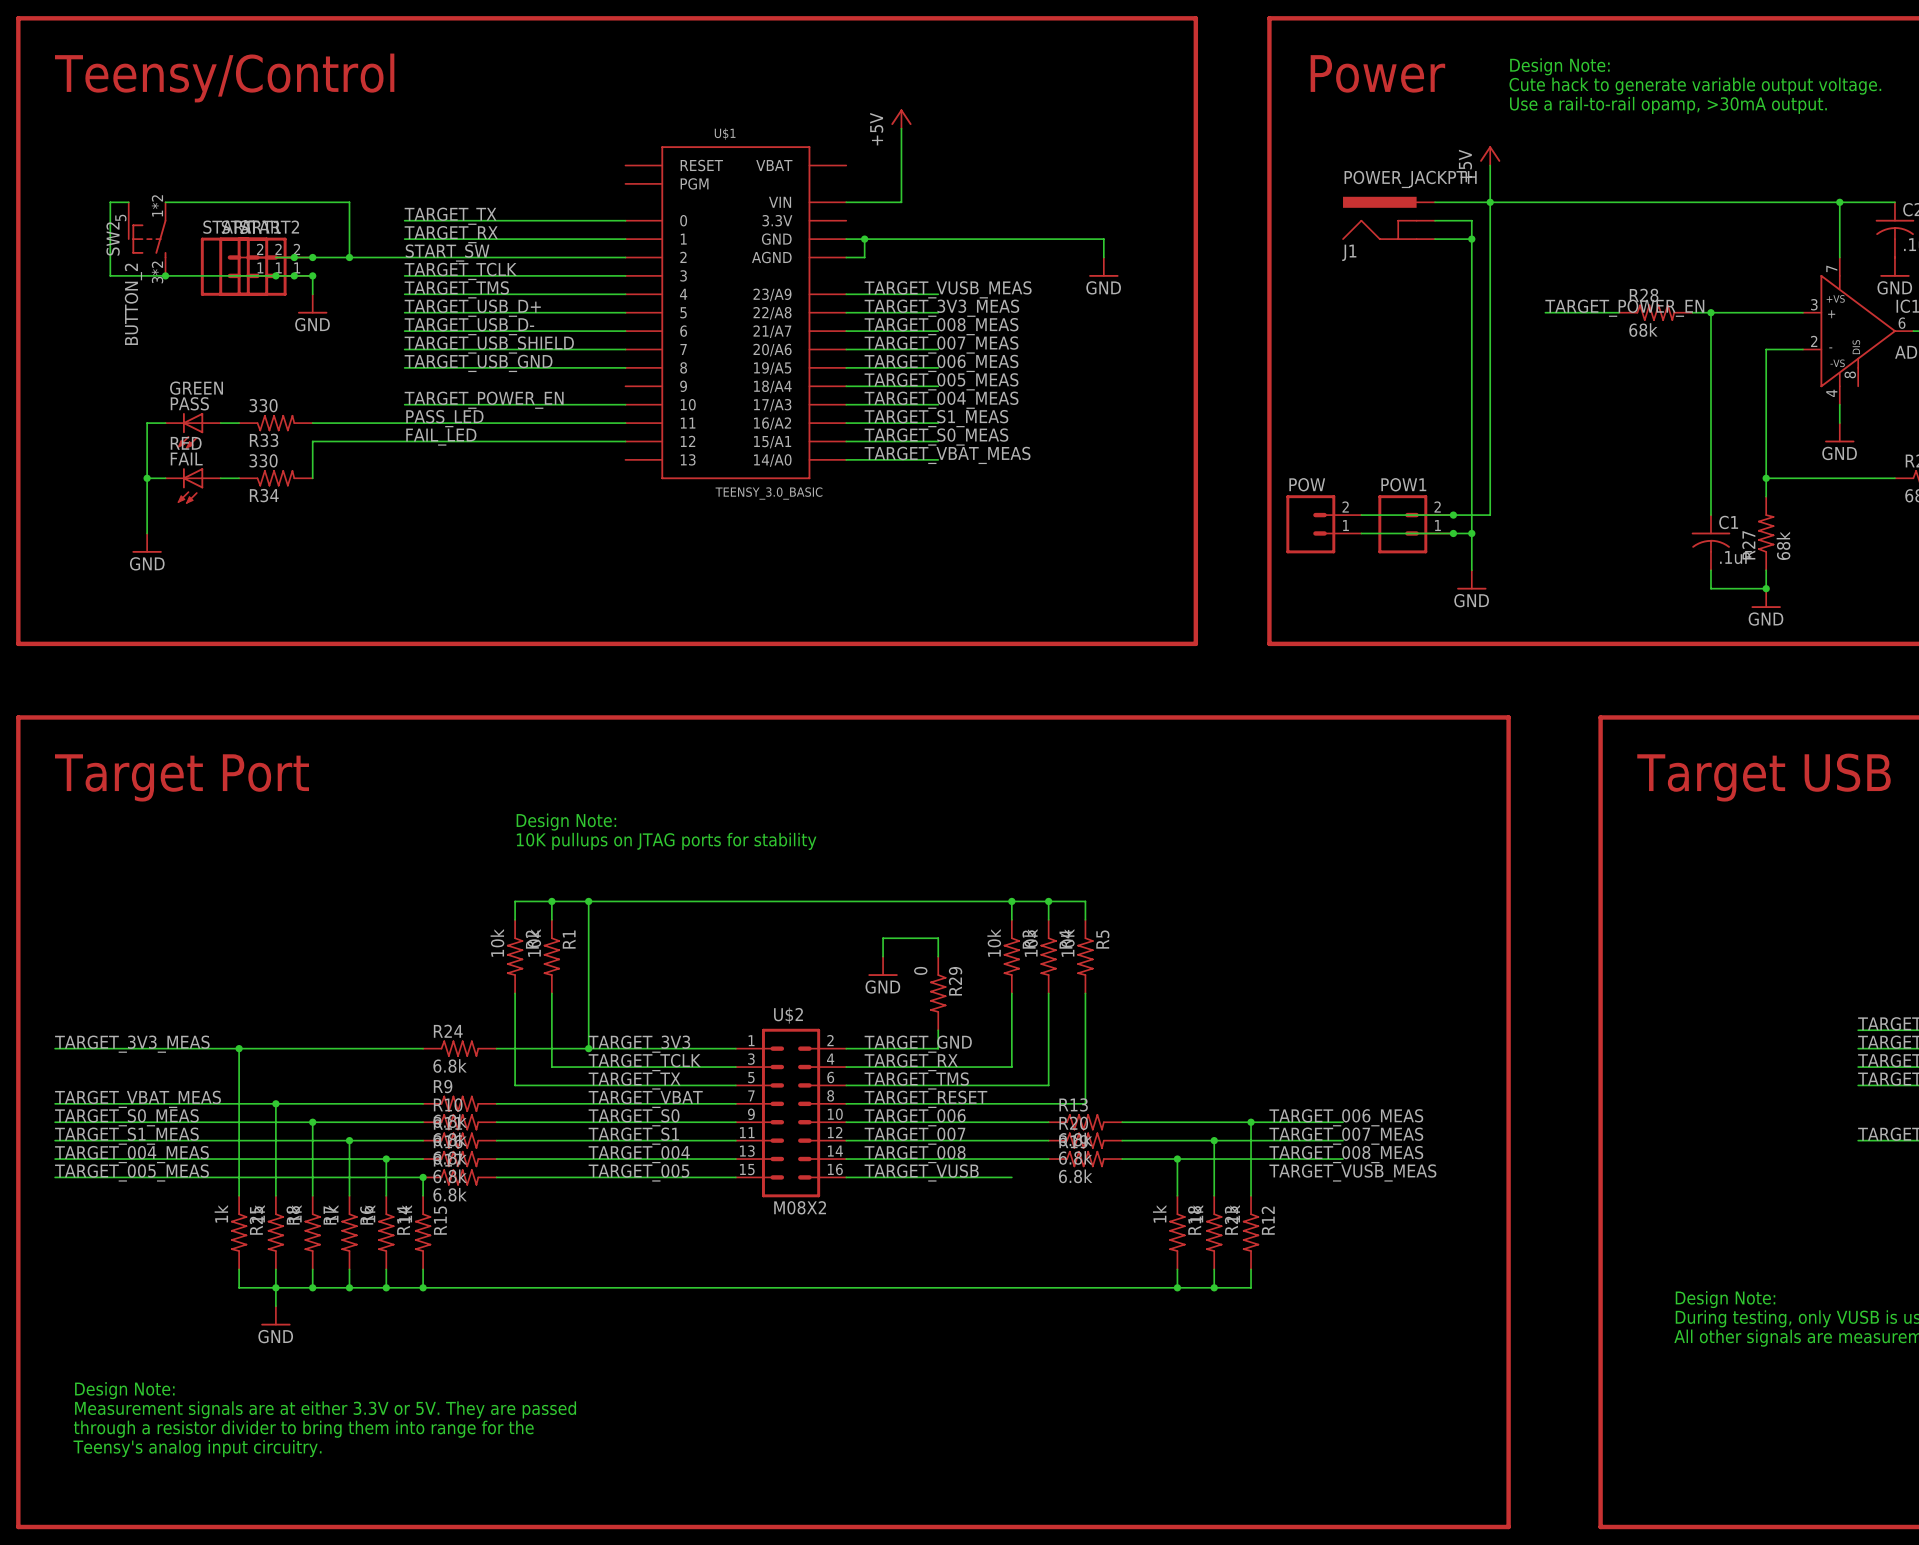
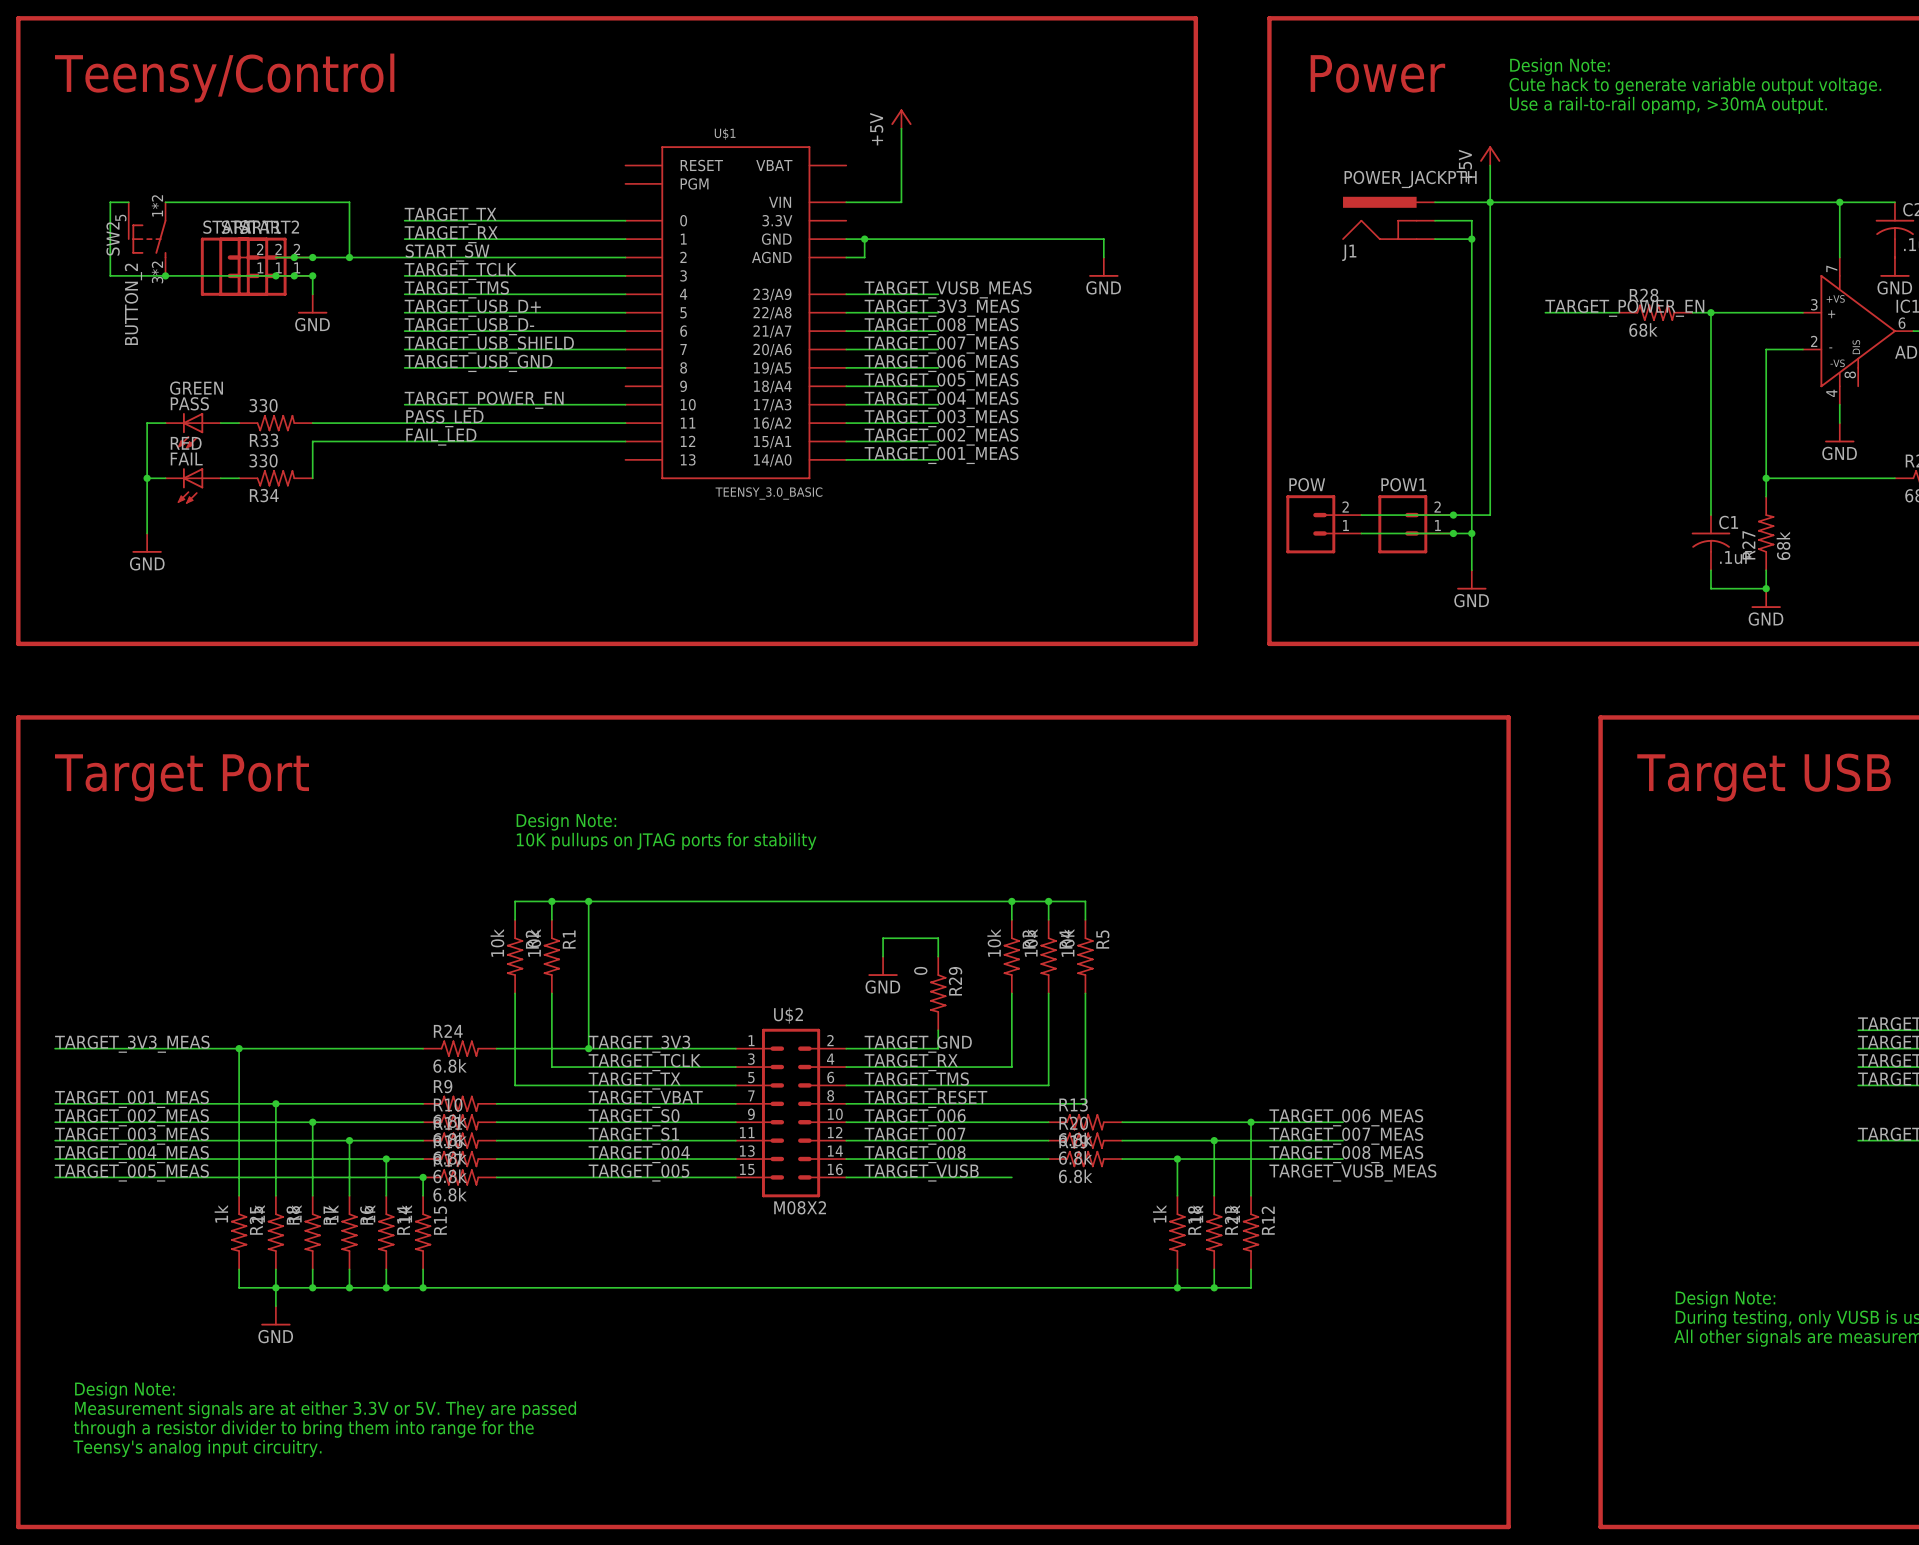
label: TARGET_S1_MEAS (936, 418) -> TARGET_003_MEAS (941, 418)
label: TARGET_S0_MEAS (936, 437) -> TARGET_002_MEAS (941, 437)
label: TARGET_VBAT_MEAS (947, 455) -> TARGET_001_MEAS (941, 455)
label: TARGET_VBAT_MEAS (138, 1099) -> TARGET_001_MEAS (132, 1099)
label: TARGET_S0_MEAS (126, 1117) -> TARGET_002_MEAS (132, 1117)
label: TARGET_S1_MEAS (126, 1136) -> TARGET_003_MEAS (132, 1136)

